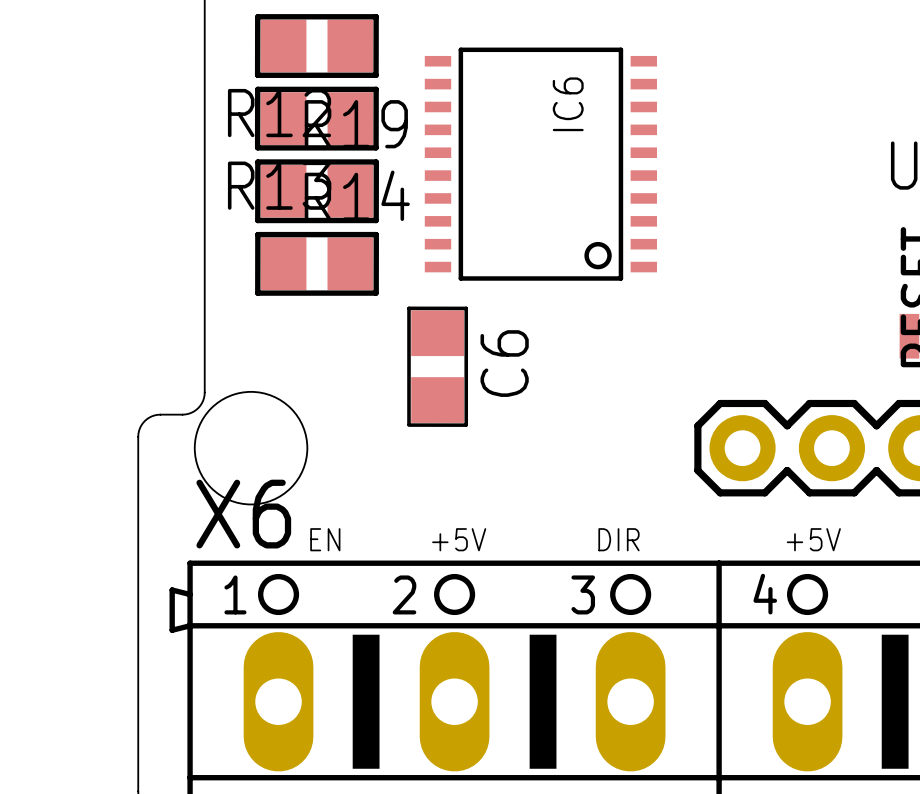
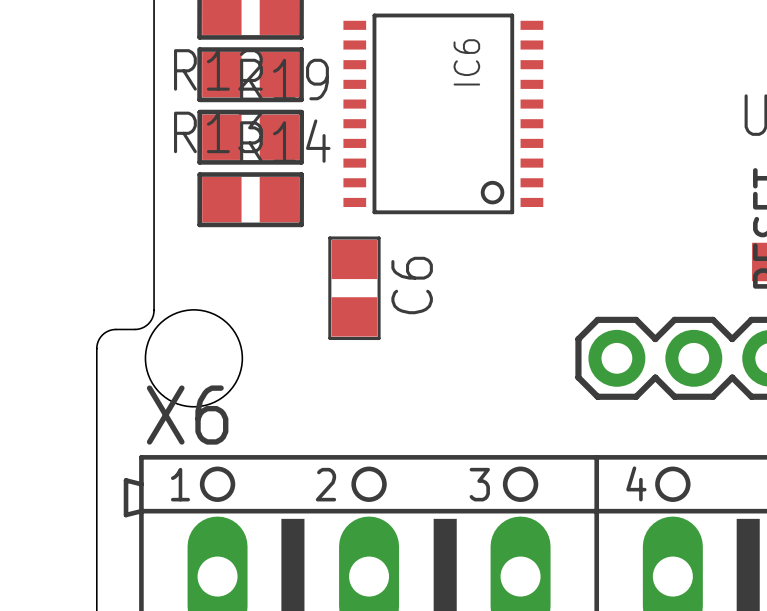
text: EN (325, 539) -> none
text: +5V (459, 539) -> none
text: DIR (618, 539) -> none
text: +5V (813, 539) -> none

